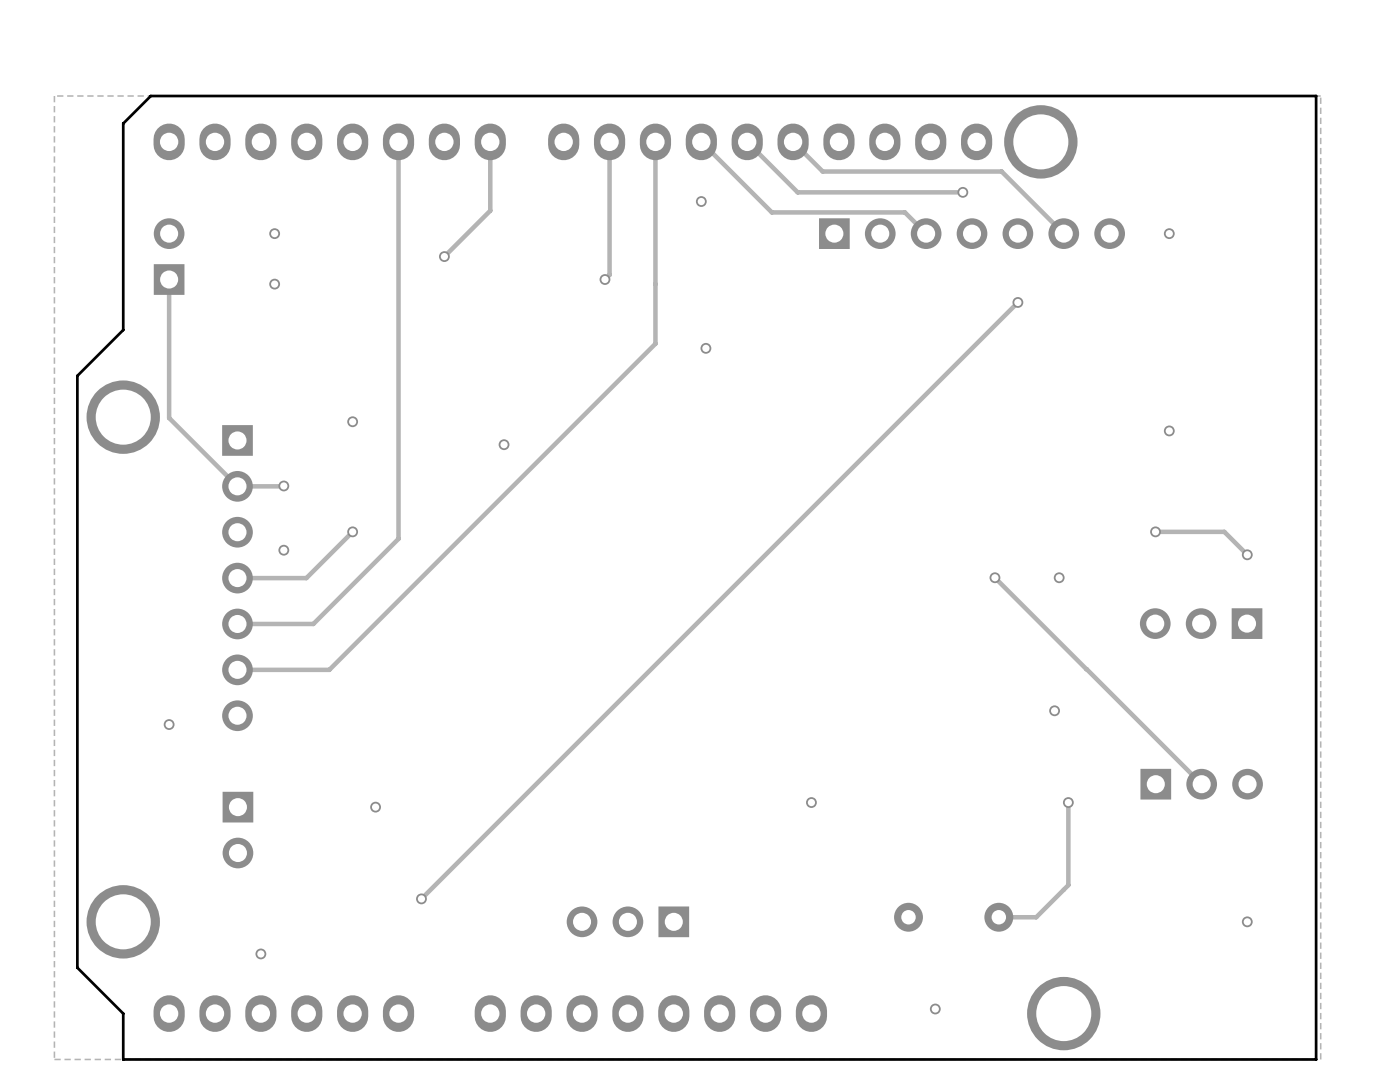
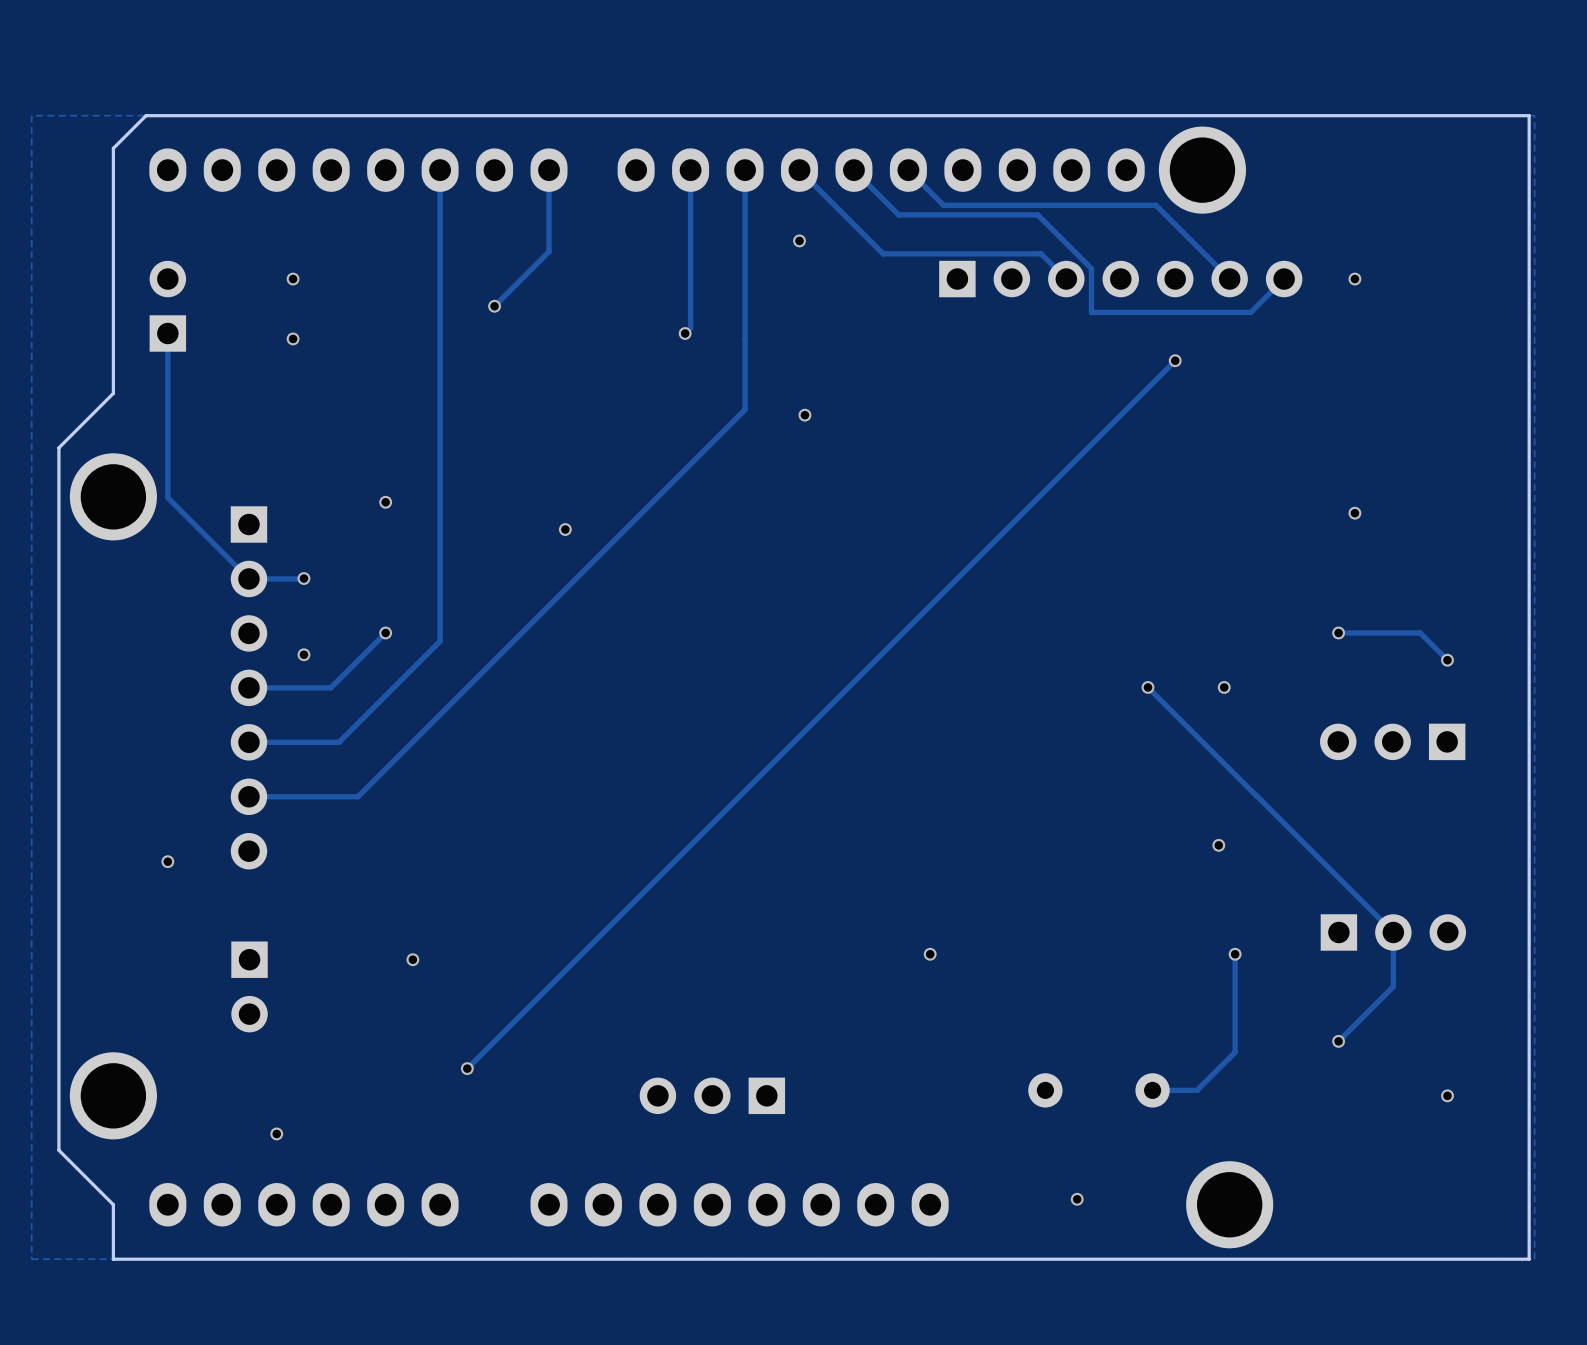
track: (784, 179) (797, 192) (962, 192) -> (898, 214) (1037, 214) (1091, 268) (1091, 312) (1250, 312) (1284, 279)
via: (962, 192) -> none
track: none -> (1393, 932) (1393, 986) (1338, 1041)
via: none -> (1338, 1041)

